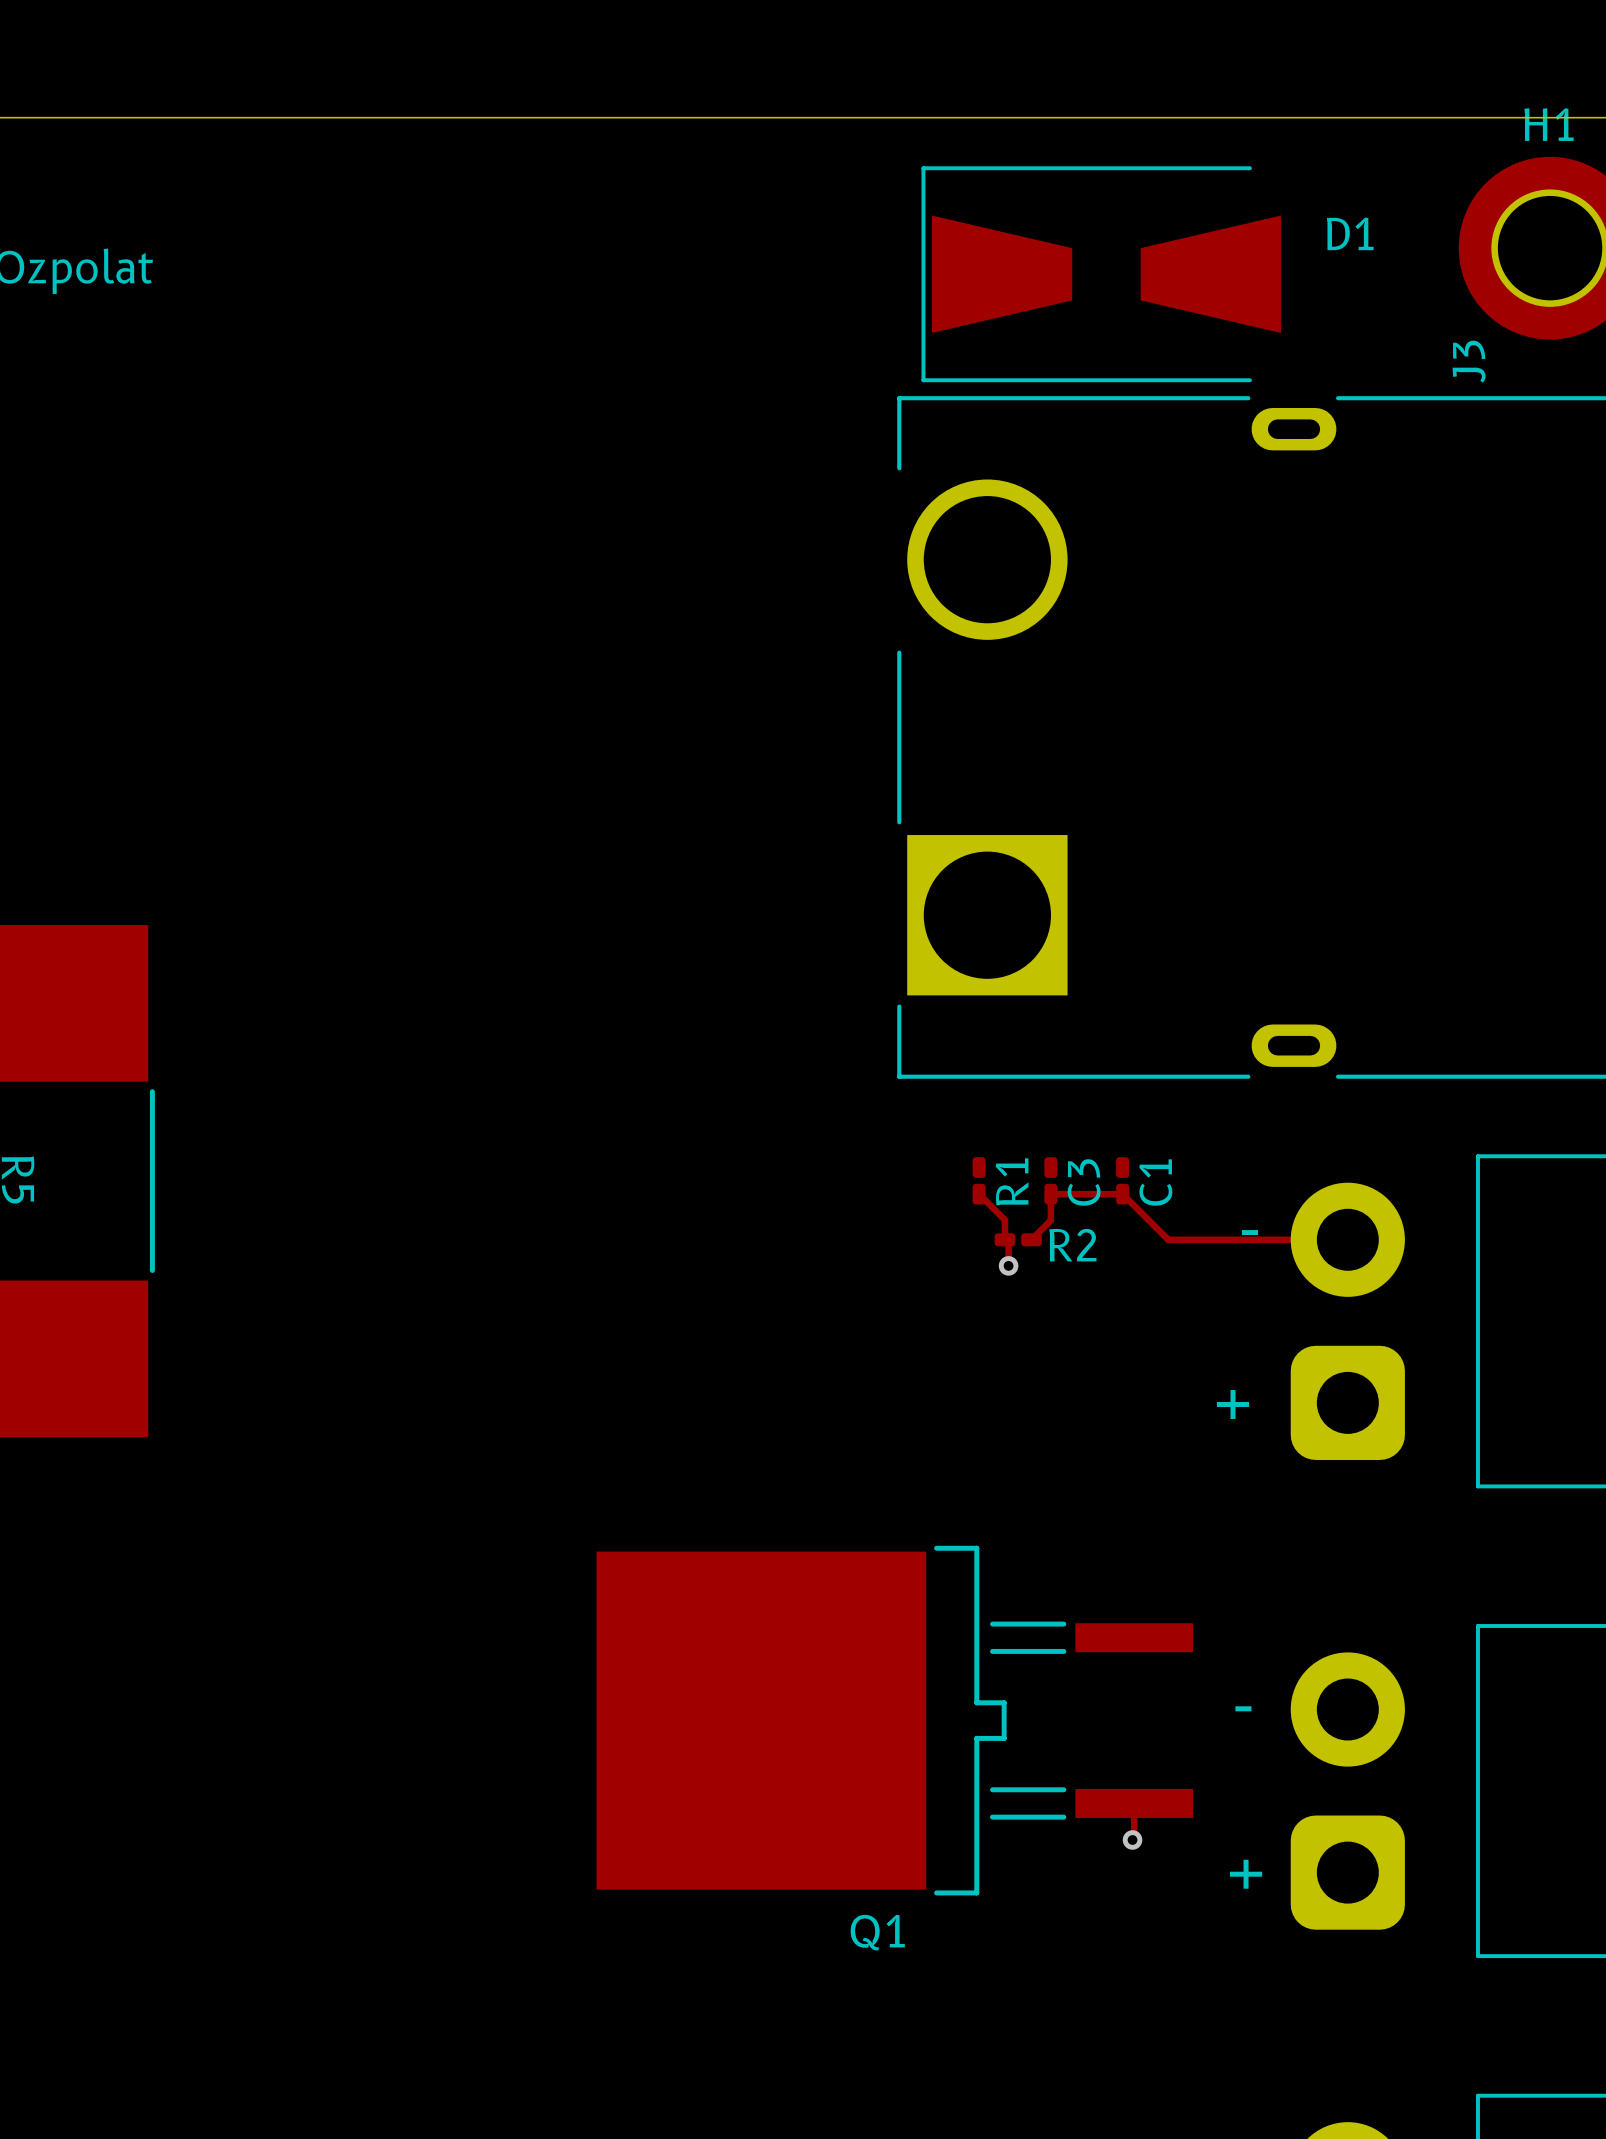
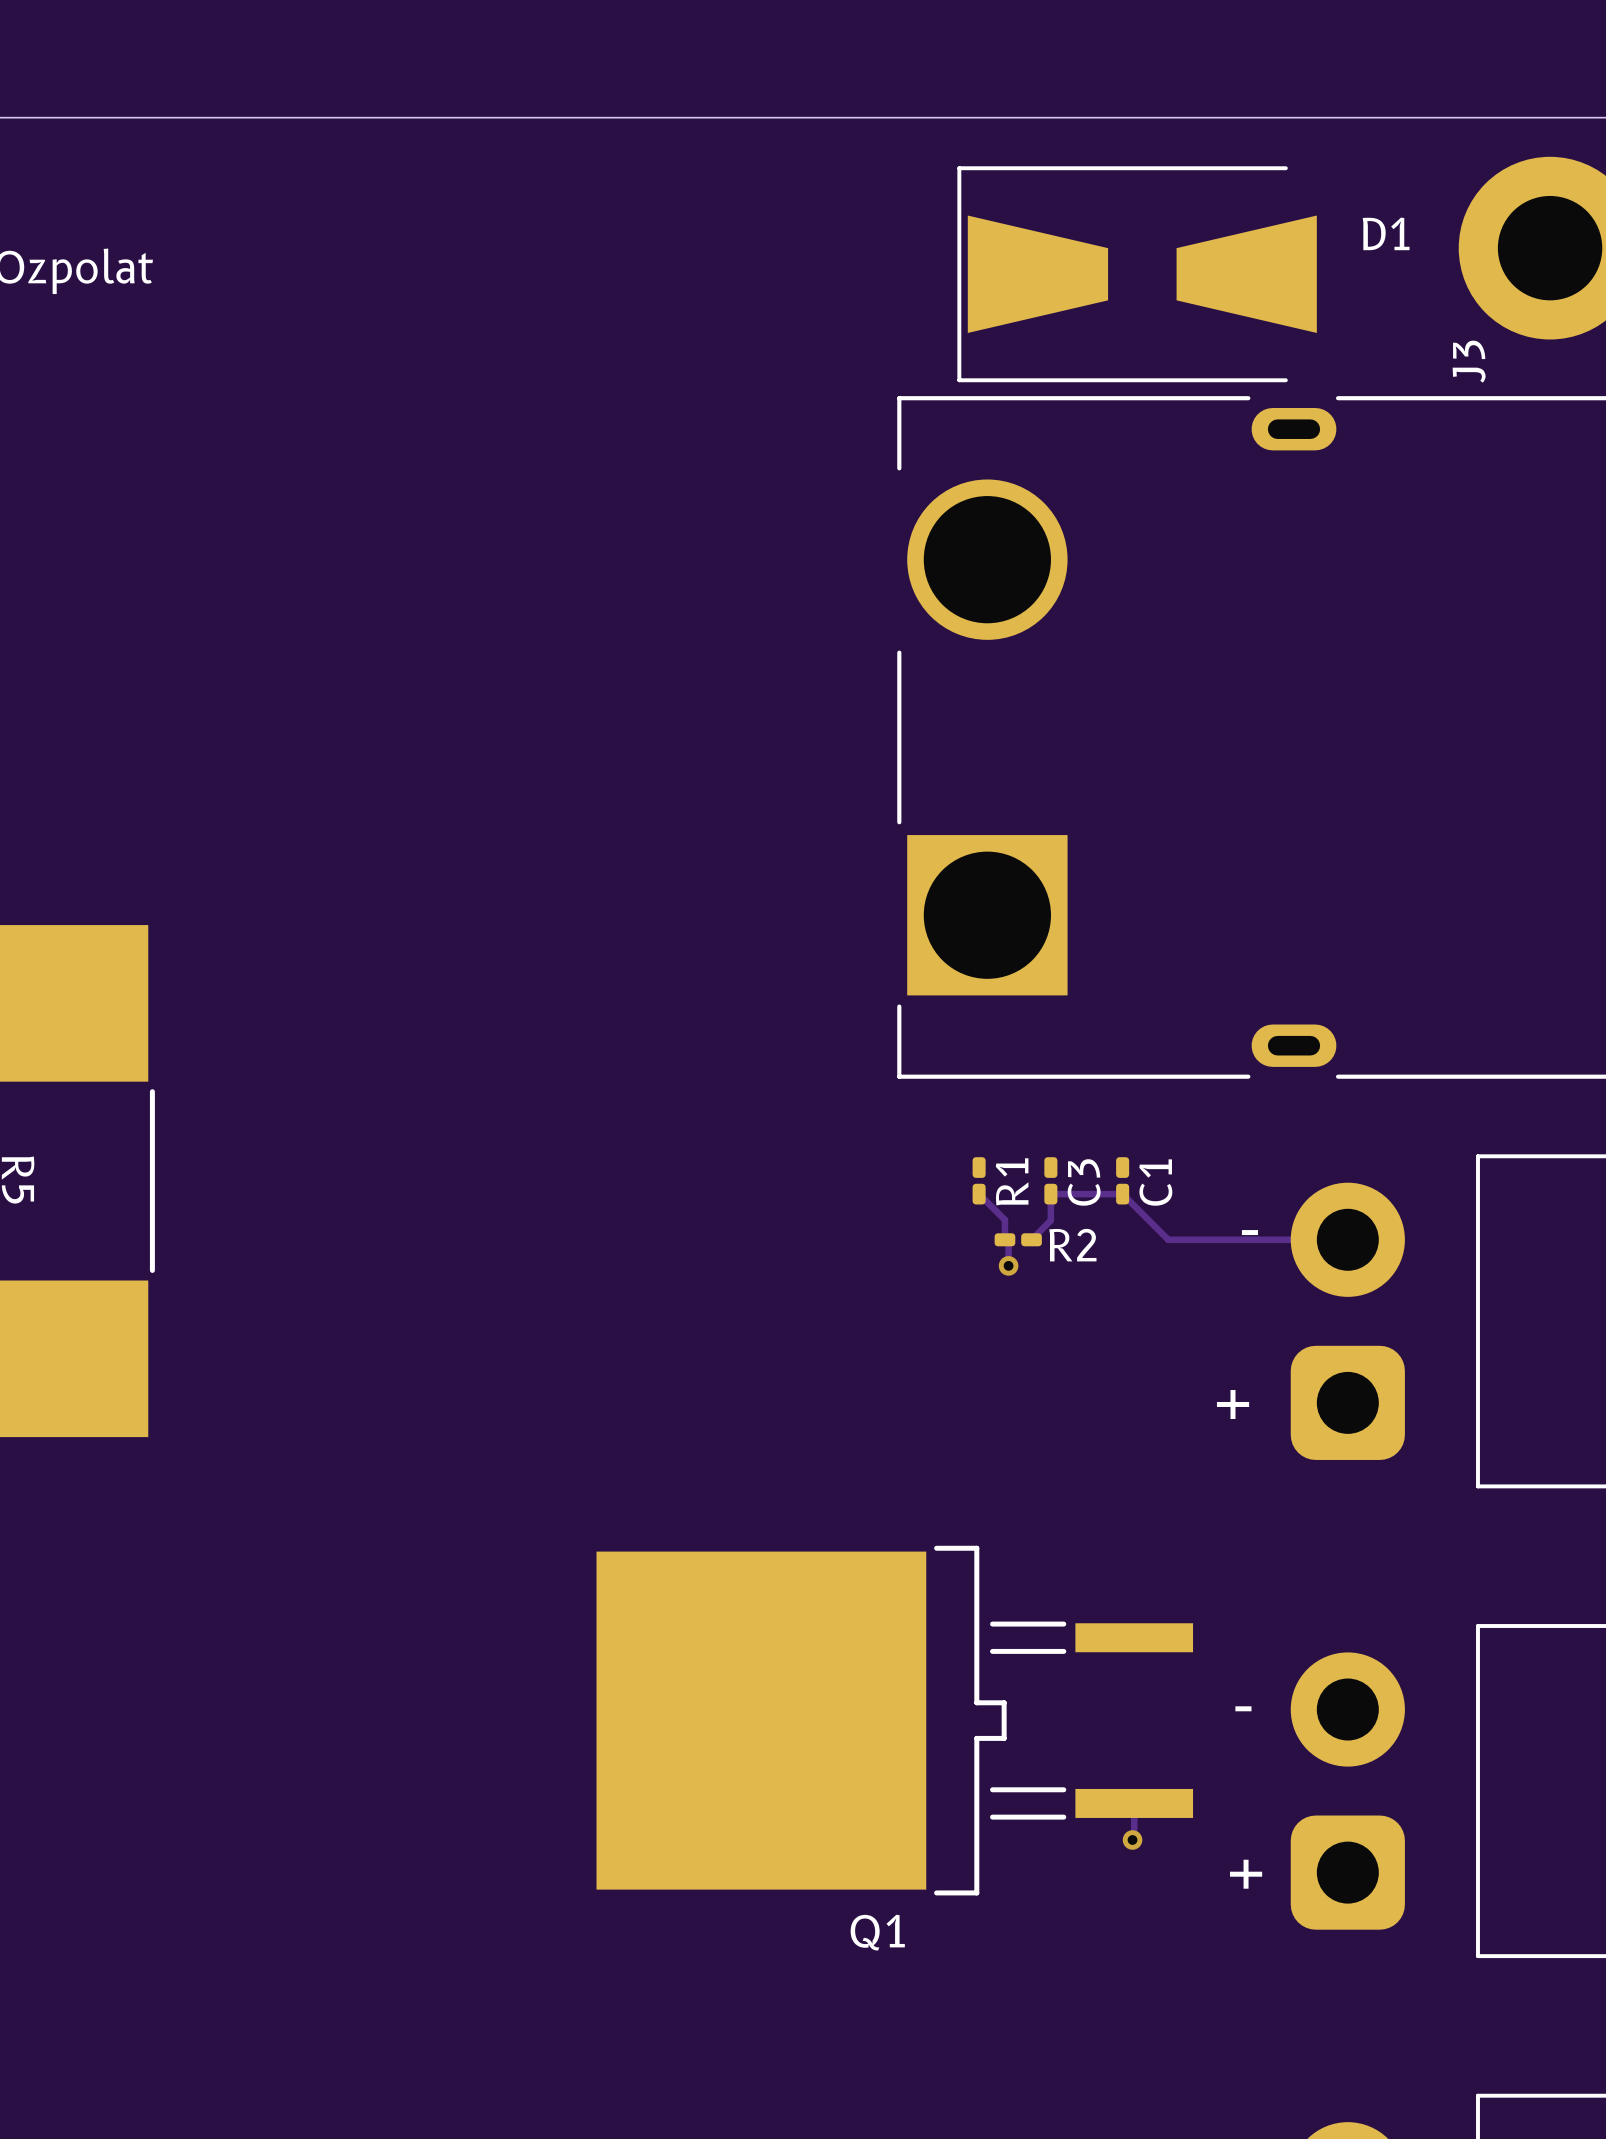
H1 name: H1 (1549, 124) -> none
D1 position: (1101, 274) -> (1137, 274)

